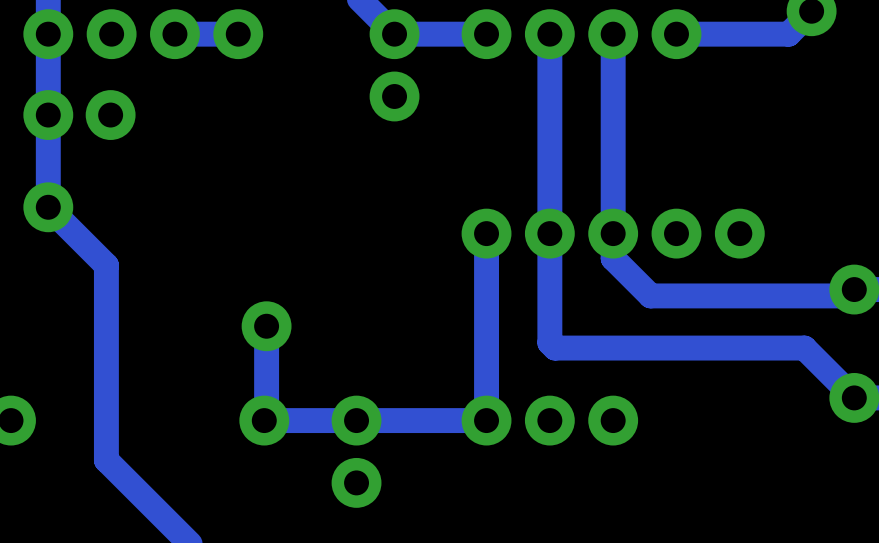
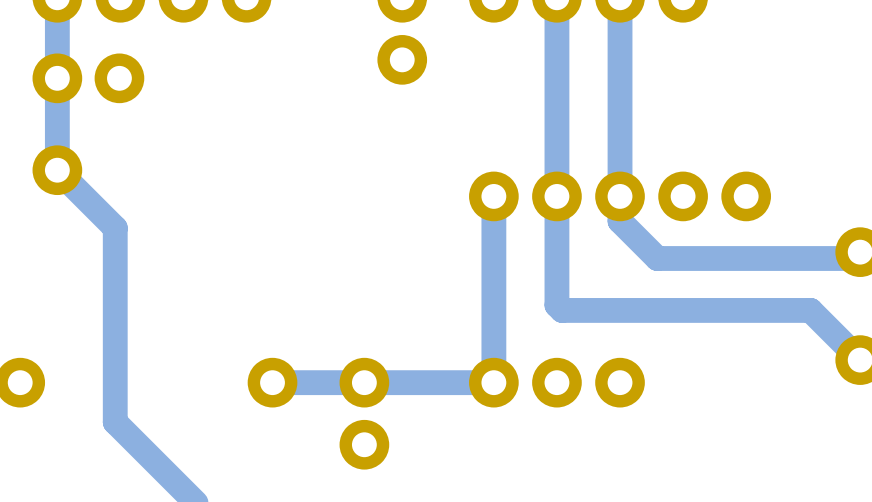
track: (266, 326) (266, 418) (264, 420) -> none
via: (266, 326) -> none

